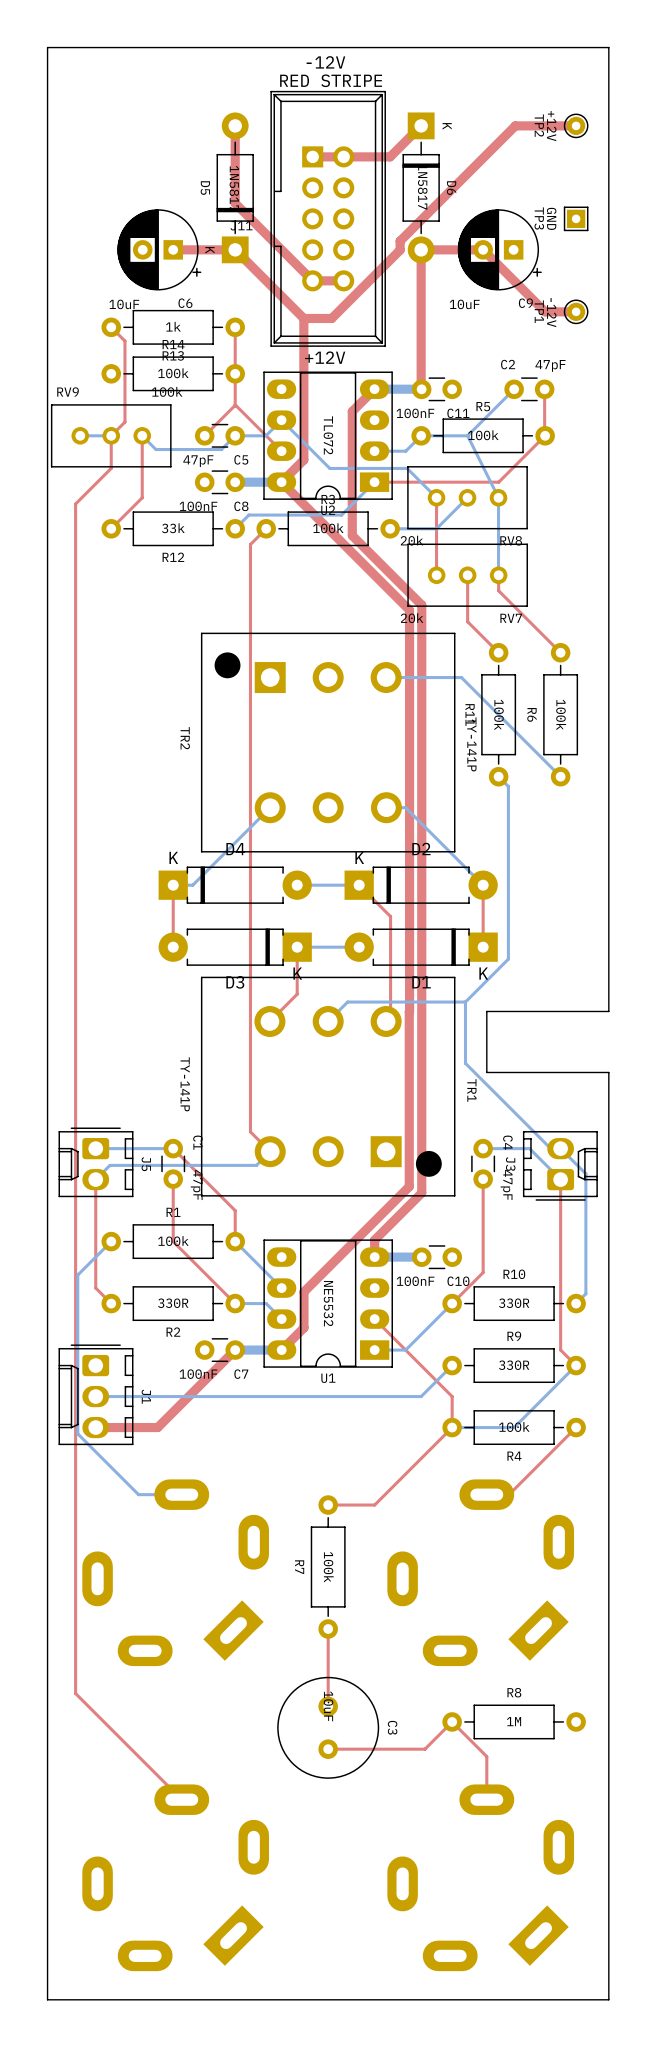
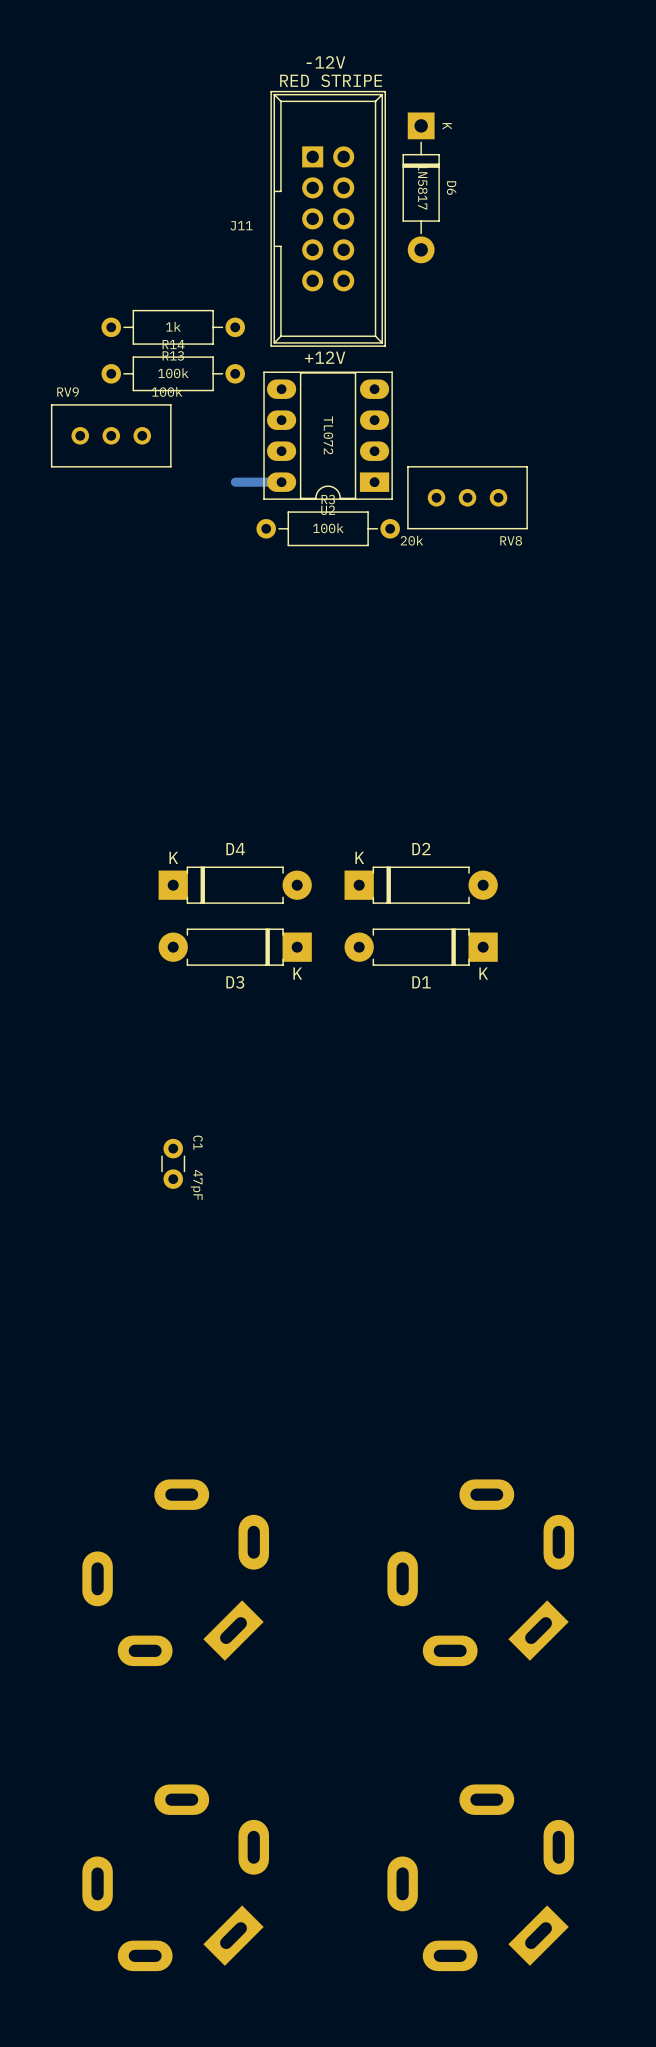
board edge: (608, 47) (608, 1011) (486, 1011) (486, 1072) (608, 1072) (608, 1999) (47, 1999) (47, 47) (608, 47) -> none
top track: (235, 125) (235, 203) (312, 280) (343, 280) -> none
top track: (421, 125) (390, 156) (312, 156) -> none
top track: (576, 125) (515, 125) (400, 241) (400, 250) (331, 318) (303, 318) -> none
TP2: +12V (576, 125) -> none
D5: 1N5817 (235, 187) -> none
TP3: GND (576, 218) -> none
C6: 10uF (159, 249) -> none
top track: (173, 249) (235, 249) (303, 318) -> none
C9: 10uF (499, 249) -> none
top track: (576, 311) (545, 311) (483, 249) (421, 249) (421, 389) -> none
TP1: -12V (576, 311) -> none
top track: (303, 318) (303, 459) (281, 482) (409, 610) (409, 1186) (303, 1291) (303, 1327) (281, 1350) -> none
top track: (111, 327) (124, 341) (124, 422) (111, 435) (111, 468) (75, 503) (75, 1693) (181, 1799) -> none
top track: (235, 327) (235, 405) (204, 435) -> none
top track: (374, 389) (352, 411) (352, 535) (421, 605) (421, 1192) (374, 1240) (374, 1257) -> none
bottom track: (421, 389) (374, 389) -> none
C11: 100nF (436, 389) -> none
bottom track: (514, 389) (467, 435) -> none
C2: 47pF (529, 389) -> none
top track: (544, 389) (545, 435) (498, 482) (374, 482) -> none
top track: (234, 405) (281, 451) -> none
bottom track: (111, 435) (80, 435) -> none
top track: (142, 435) (142, 497) (111, 528) -> none
bottom track: (142, 435) (155, 449) (221, 449) (235, 435) (265, 435) (281, 420) (329, 468) (407, 468) (436, 497) -> none
C5: 47pF (219, 435) -> none
bottom track: (467, 435) (498, 497) (498, 575) -> none
bottom track: (467, 435) (421, 435) (405, 451) (374, 451) -> none
R5: 100k (483, 435) -> none
C8: 100nF (219, 482) -> none
bottom track: (374, 482) (341, 515) (248, 515) (235, 528) -> none
top track: (436, 497) (436, 575) -> none
bottom track: (467, 497) (436, 528) (390, 528) -> none
R12: 33k (173, 528) -> none
top track: (266, 528) (250, 544) (250, 1131) (270, 1151) -> none
top track: (467, 575) (467, 621) (498, 652) -> none
RV7: 20k (467, 575) -> none
top track: (498, 575) (498, 590) (560, 652) -> none
bottom track: (386, 677) (461, 677) (560, 776) -> none
R11: 100k (498, 714) -> none
R6: 100k (560, 714) -> none
TR2: TY-141P (328, 742) -> none
bottom track: (498, 776) (508, 786) (508, 959) (465, 1002) -> none
bottom track: (270, 807) (192, 885) (173, 885) -> none
bottom track: (386, 807) (405, 807) (483, 885) -> none
top track: (173, 885) (173, 947) -> none
top track: (359, 885) (390, 916) (390, 1017) (386, 1021) -> none
bottom track: (359, 885) (297, 885) -> none
top track: (483, 885) (483, 947) -> none
top track: (297, 947) (297, 994) (269, 1021) -> none
bottom track: (359, 947) (297, 947) -> none
bottom track: (465, 1002) (347, 1002) (328, 1021) -> none
bottom track: (465, 1002) (465, 1063) (550, 1148) (560, 1148) (585, 1173) (585, 1293) (576, 1303) -> none
TR1: TY-141P (328, 1086) -> none
top track: (173, 1148) (235, 1210) (235, 1241) -> none
bottom track: (173, 1148) (95, 1148) -> none
bottom track: (483, 1148) (529, 1148) (560, 1179) -> none
bottom track: (270, 1151) (256, 1165) (109, 1165) (95, 1179) -> none
J5: (95, 1162) -> none
C4: 47pF (483, 1163) -> none
J3: (560, 1165) -> none
top track: (95, 1179) (95, 1288) (111, 1303) -> none
top track: (173, 1179) (173, 1241) (235, 1303) -> none
top track: (483, 1179) (483, 1272) (452, 1303) -> none
top track: (560, 1179) (560, 1350) (576, 1365) -> none
bottom track: (111, 1241) (77, 1275) (77, 1433) (138, 1494) (181, 1494) -> none
R1: 100k (173, 1241) -> none
bottom track: (235, 1241) (281, 1288) -> none
bottom track: (421, 1257) (374, 1257) -> none
C10: 100nF (437, 1257) -> none
R2: 330R (173, 1303) -> none
bottom track: (235, 1303) (266, 1303) (281, 1319) -> none
U1: NE5532 (328, 1303) -> none
bottom track: (452, 1303) (405, 1350) (374, 1350) -> none
R10: 330R (514, 1303) -> none
top track: (374, 1319) (452, 1396) (452, 1427) (374, 1505) (328, 1505) -> none
C7: 100nF (219, 1350) -> none
top track: (235, 1350) (157, 1427) (95, 1427) -> none
bottom track: (281, 1350) (235, 1350) -> none
bottom track: (452, 1365) (421, 1396) (95, 1396) -> none
R9: 330R (514, 1365) -> none
bottom track: (576, 1365) (514, 1427) (452, 1427) -> none
J1: (95, 1394) -> none
R4: 100k (514, 1427) -> none
top track: (576, 1427) (509, 1494) (486, 1494) -> none
R7: 100k (328, 1567) -> none
top track: (328, 1628) (328, 1706) -> none
R8: 1M (514, 1721) -> none
C3: 10uF (328, 1727) -> none
top track: (328, 1749) (424, 1749) (452, 1721) (486, 1756) (486, 1799) -> none

